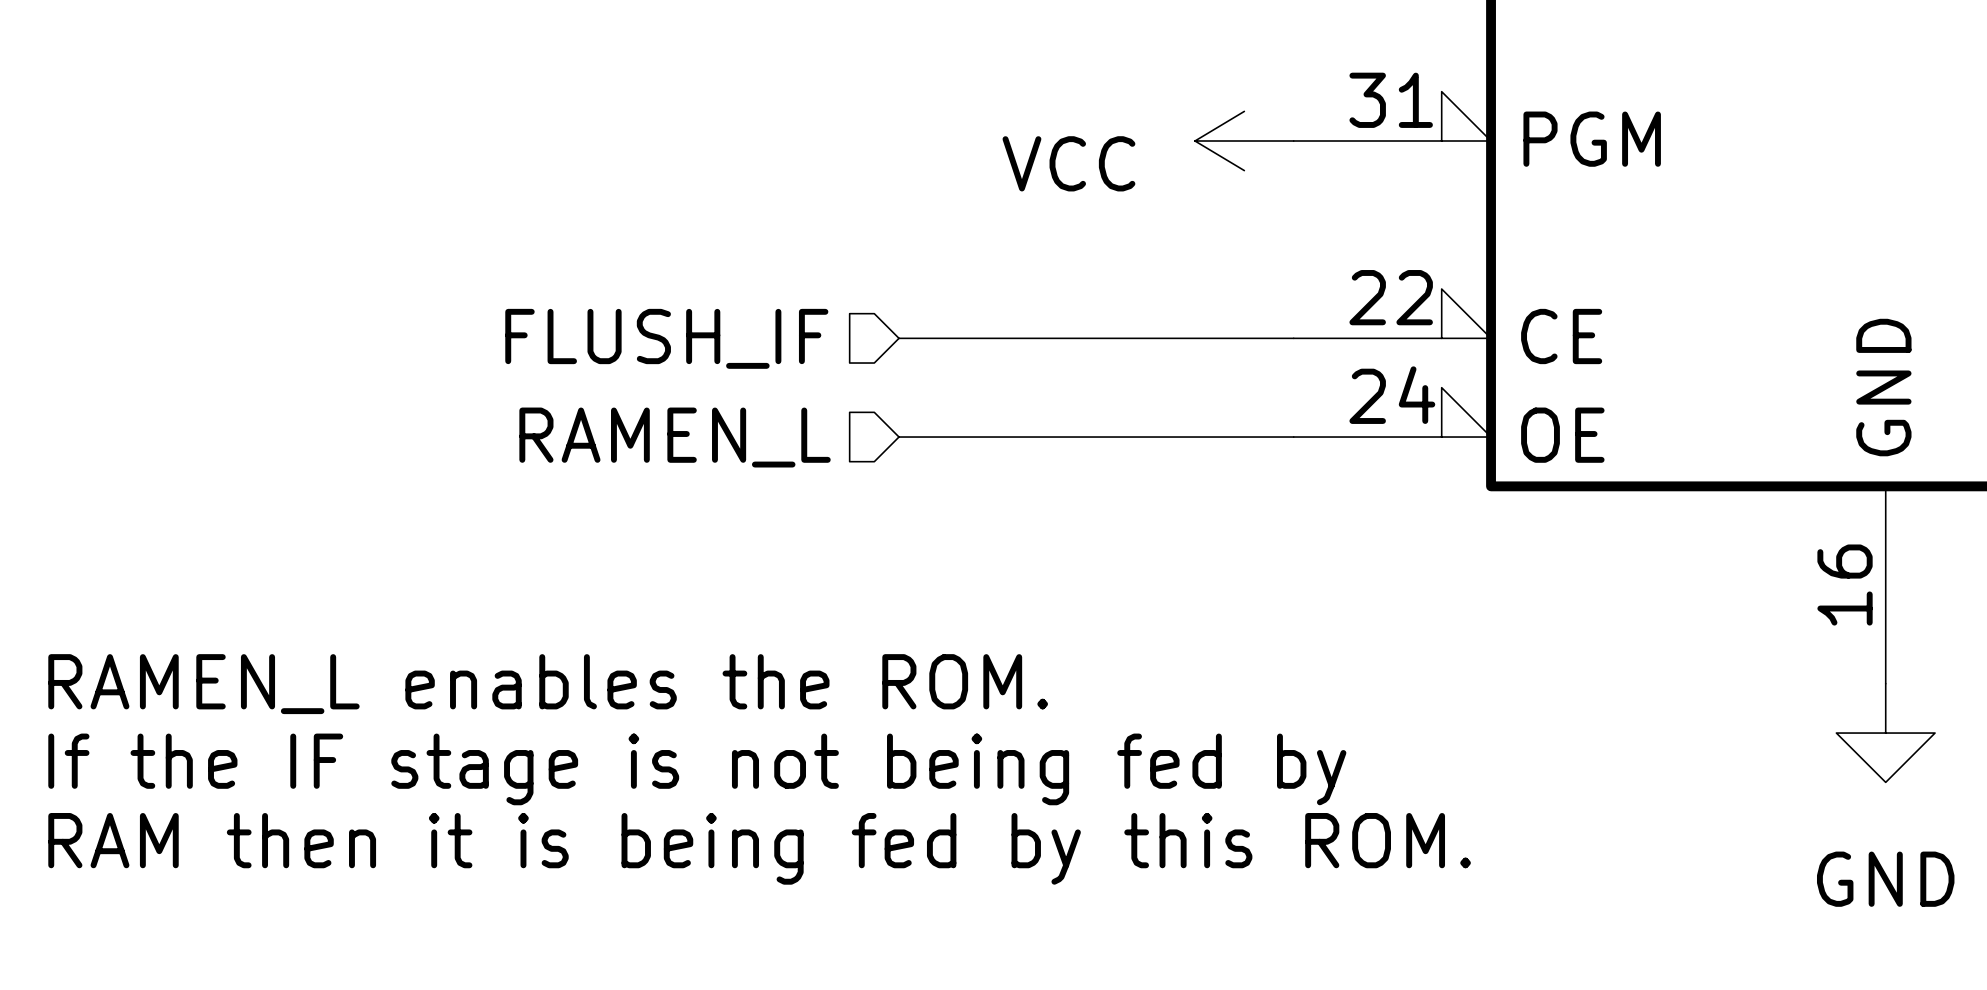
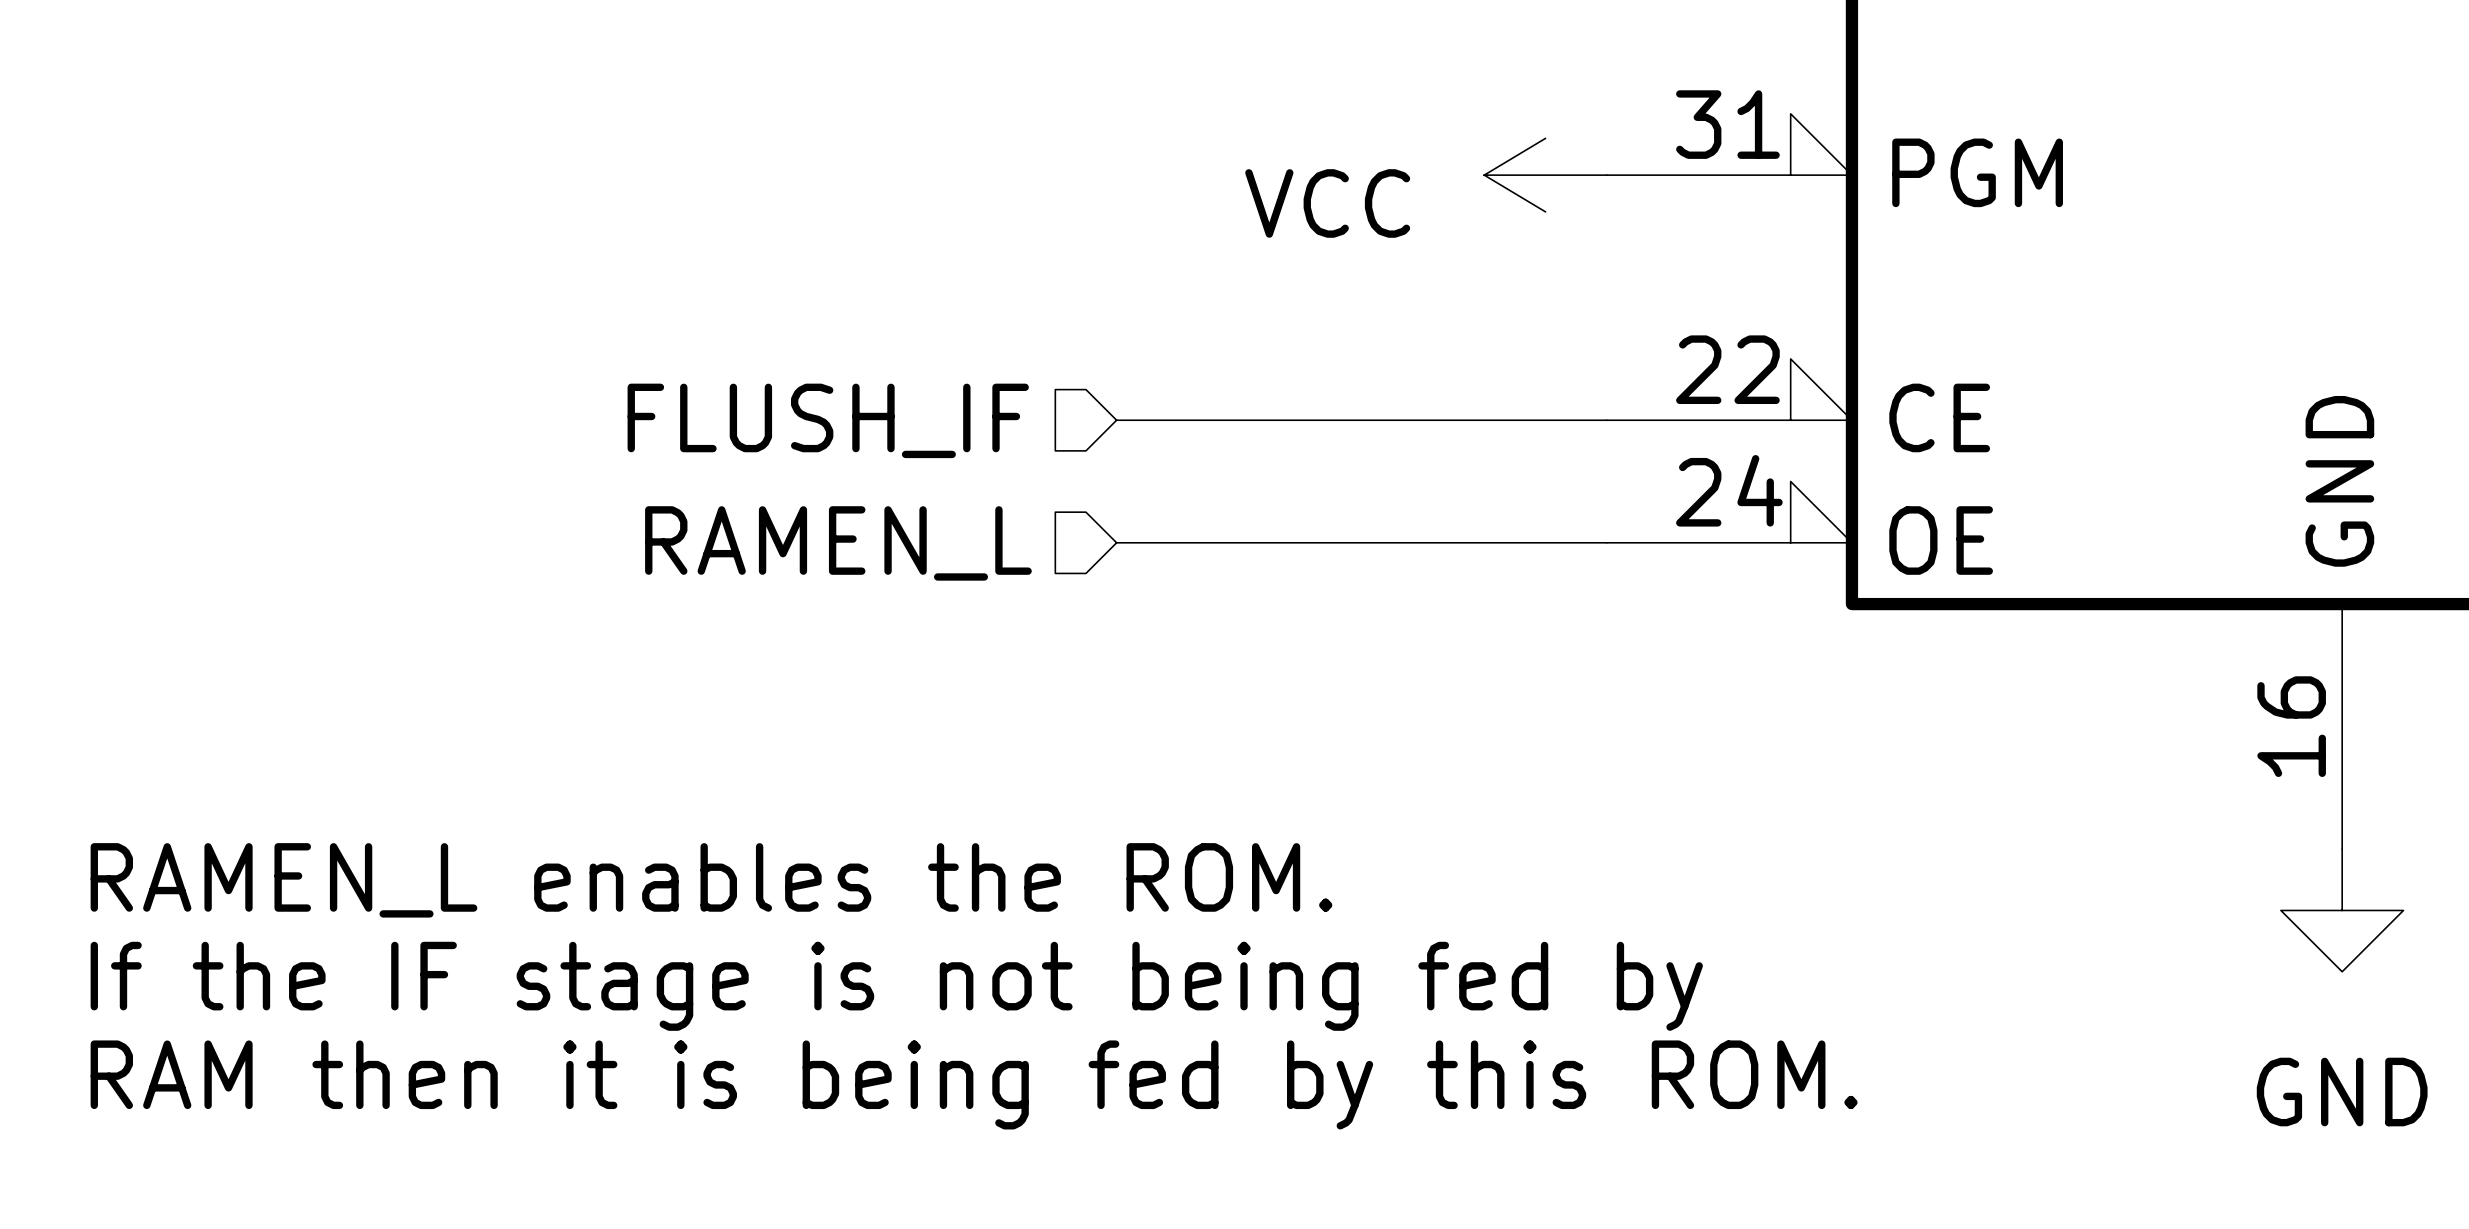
text position: RAMEN_L enables the ROM. (548, 684) -> RAMEN_L enables the ROM. (711, 880)
text position: If the IF stage is not being fed by (697, 769) -> If the IF stage is not being fed by (896, 986)
text position: RAM then it is being fed by this ROM. (759, 848) -> RAM then it is being fed by this ROM. (974, 1084)

